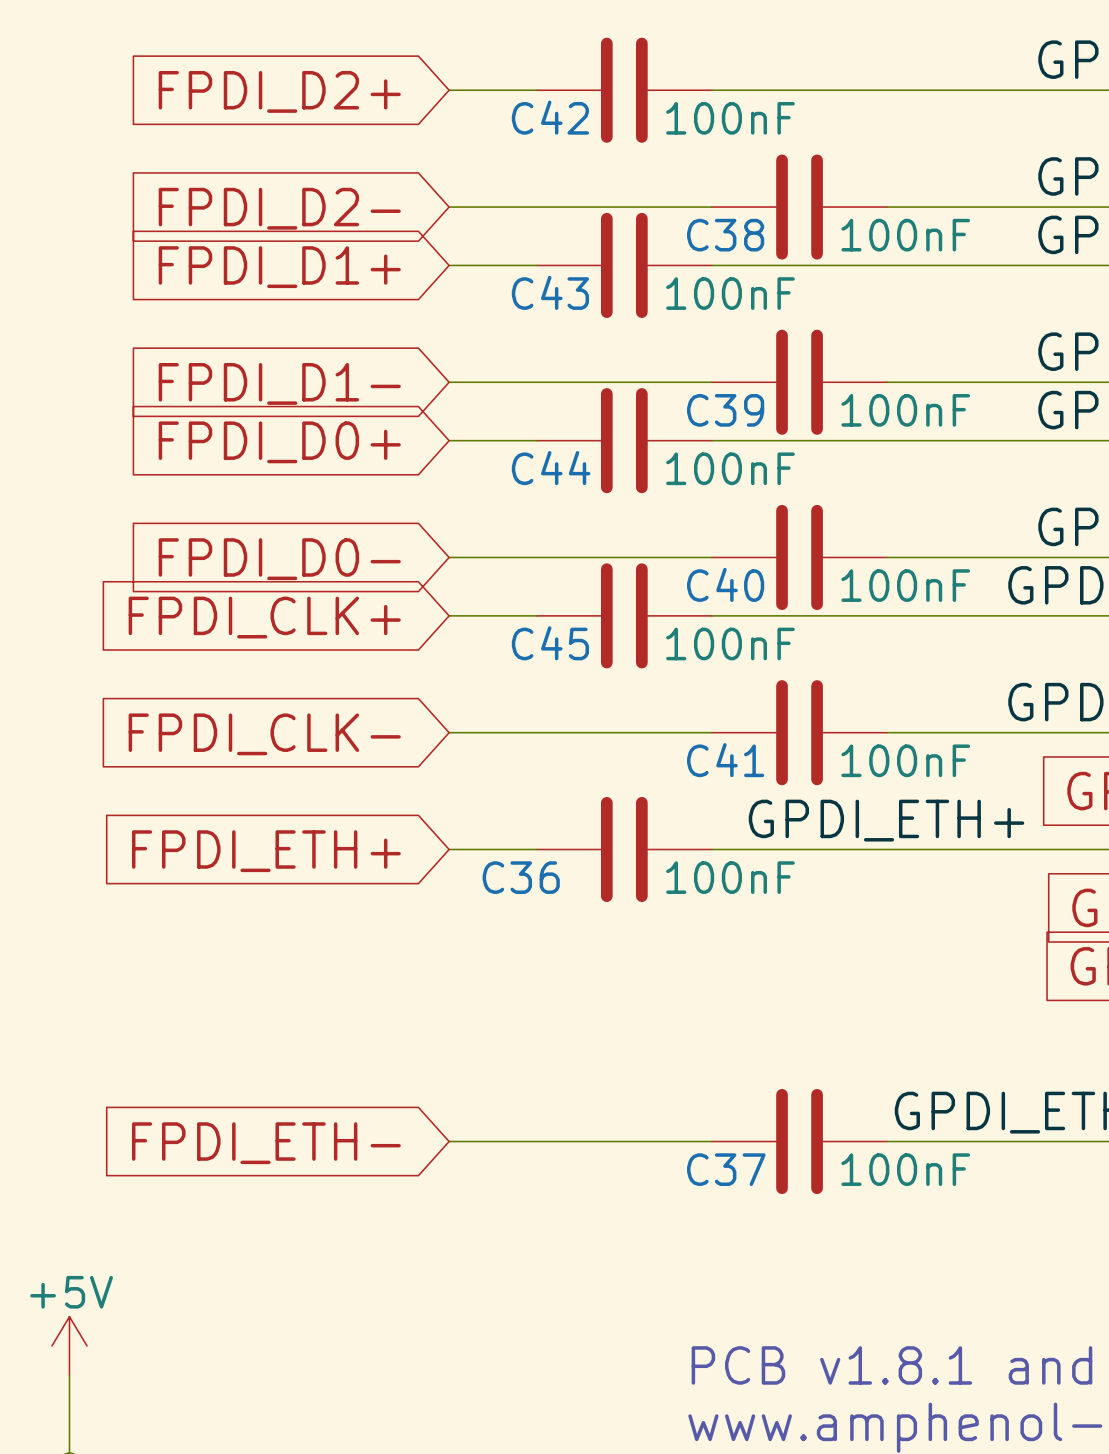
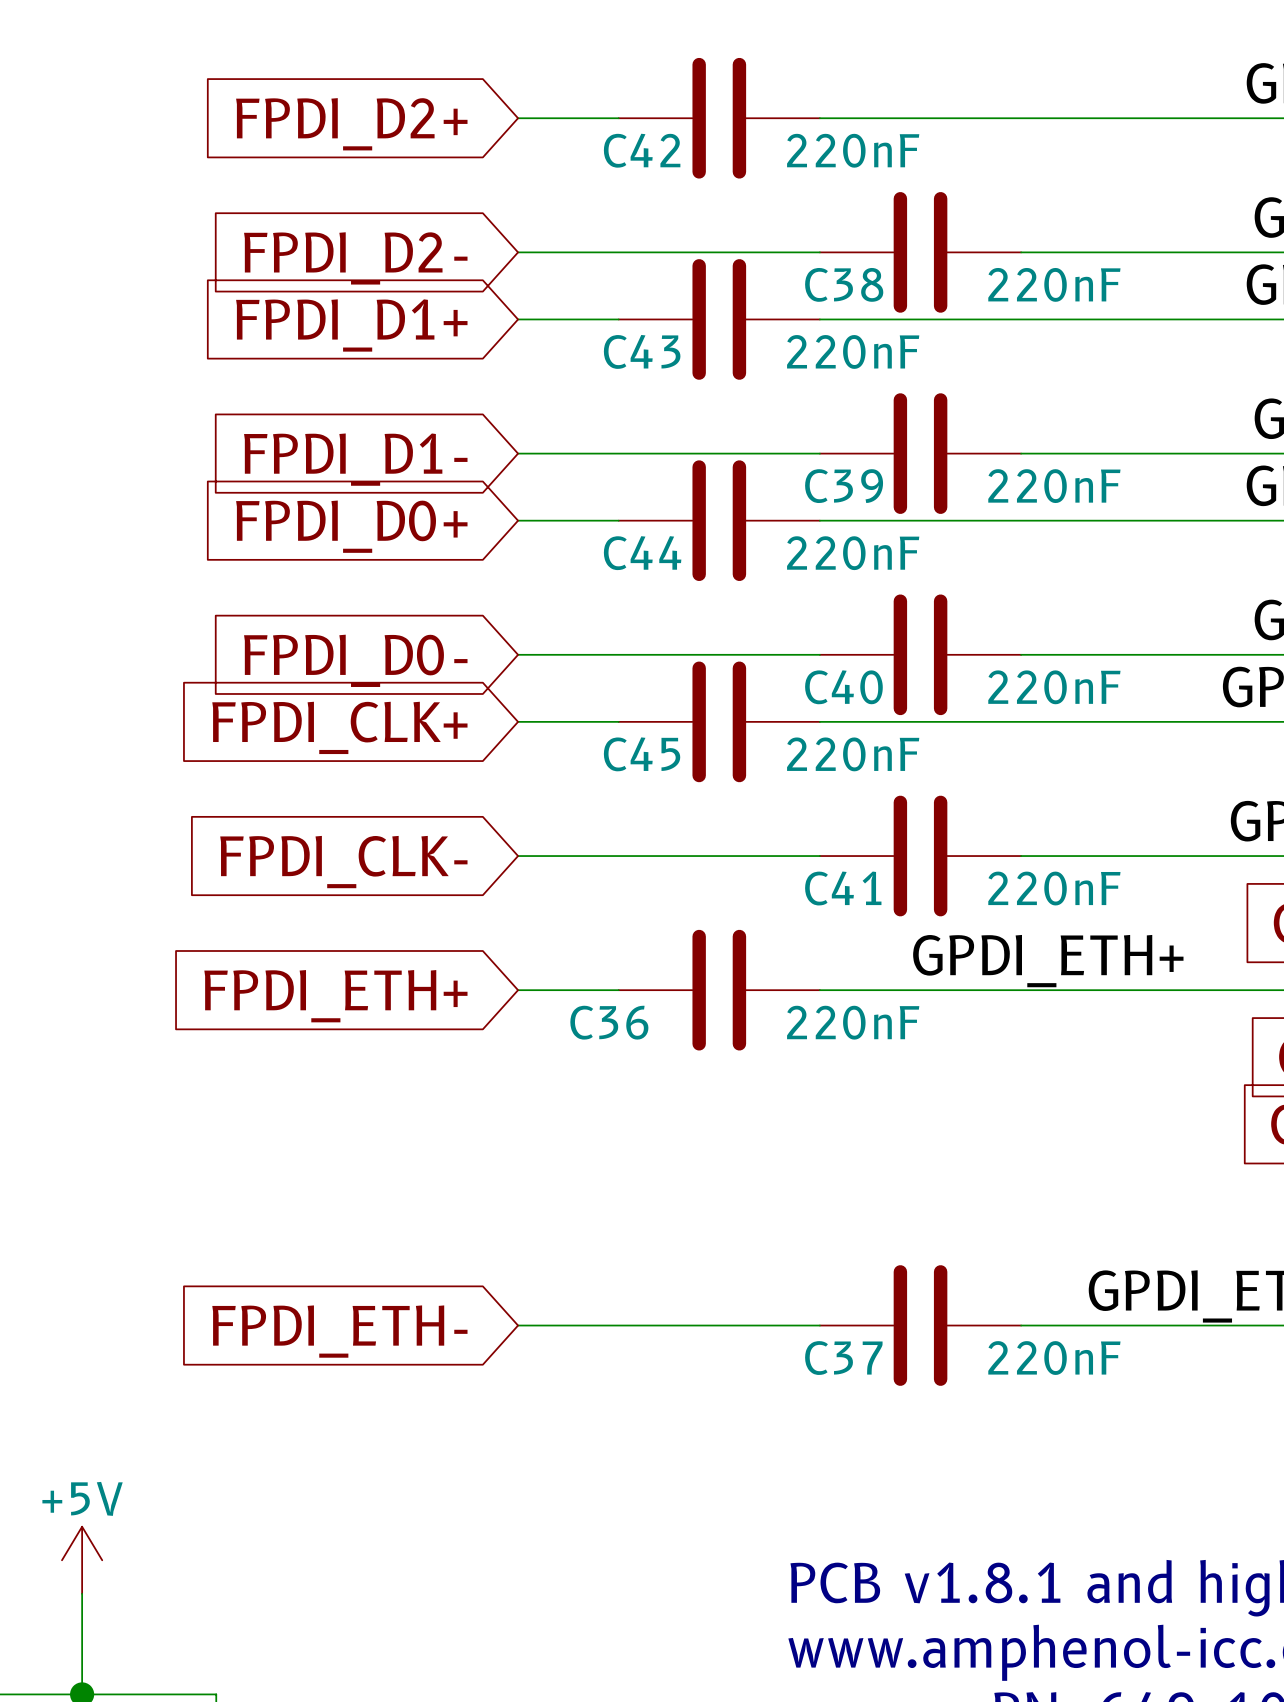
C42 value: 100nF (730, 118) -> 220nF (853, 150)
C38 value: 100nF (905, 235) -> 220nF (1054, 284)
C43 value: 100nF (730, 293) -> 220nF (853, 351)
C39 value: 100nF (905, 410) -> 220nF (1054, 486)
C44 value: 100nF (730, 468) -> 220nF (853, 553)
C40 value: 100nF (905, 585) -> 220nF (1054, 687)
C45 value: 100nF (730, 643) -> 220nF (853, 754)
C41 value: 100nF (905, 760) -> 220nF (1054, 888)
C36 value: 100nF (730, 877) -> 220nF (853, 1022)
C37 value: 100nF (905, 1169) -> 220nF (1054, 1358)

